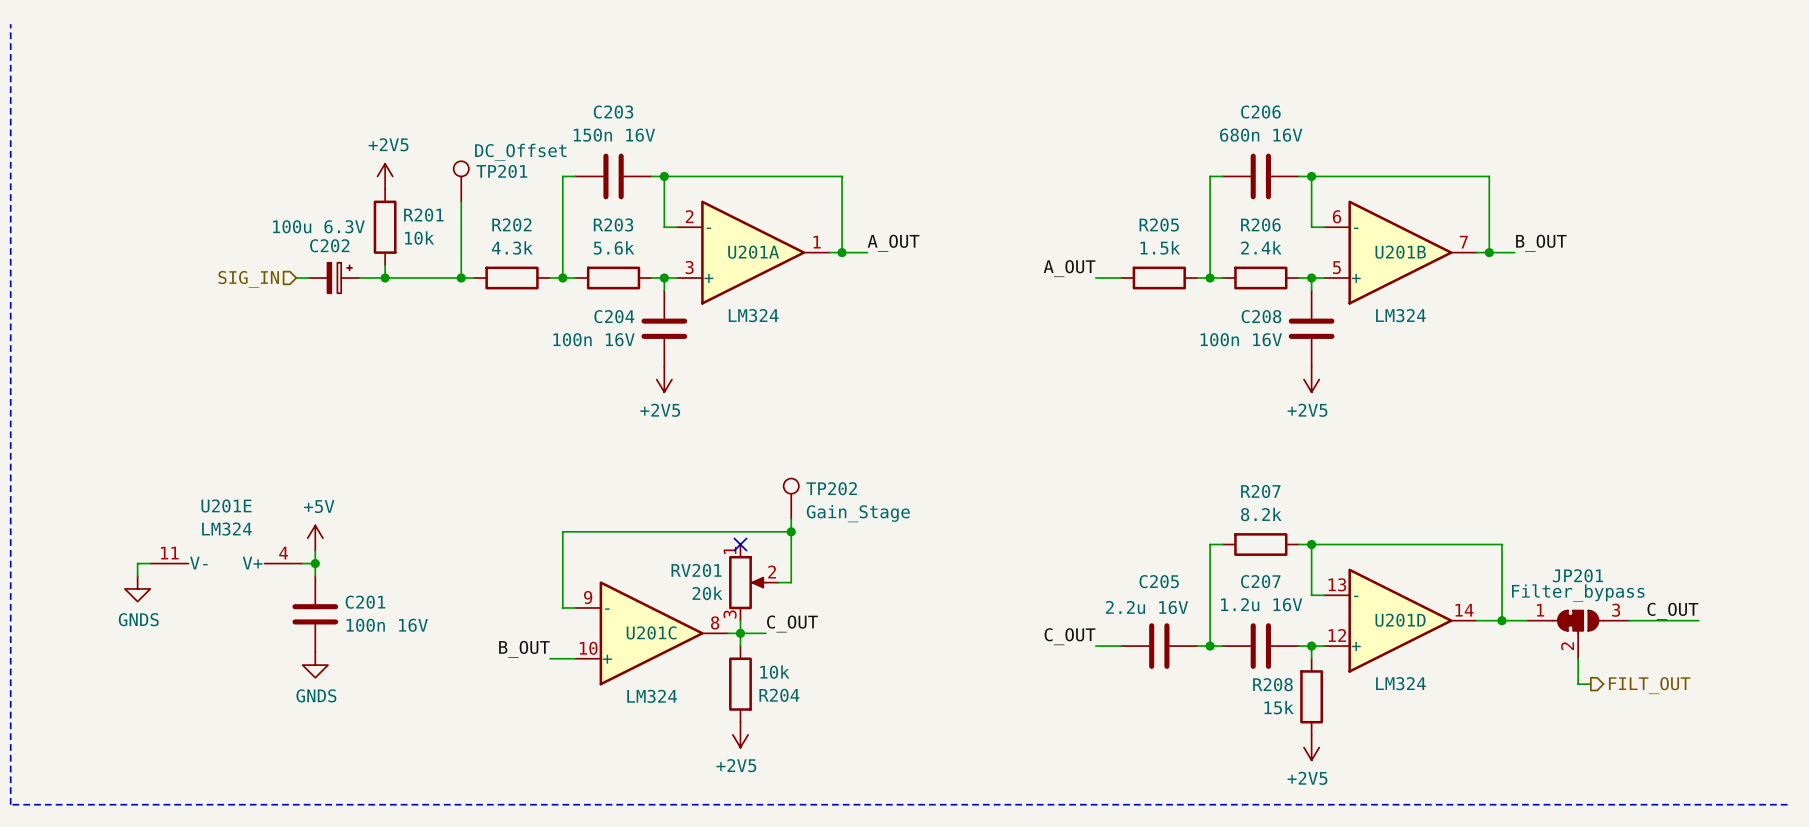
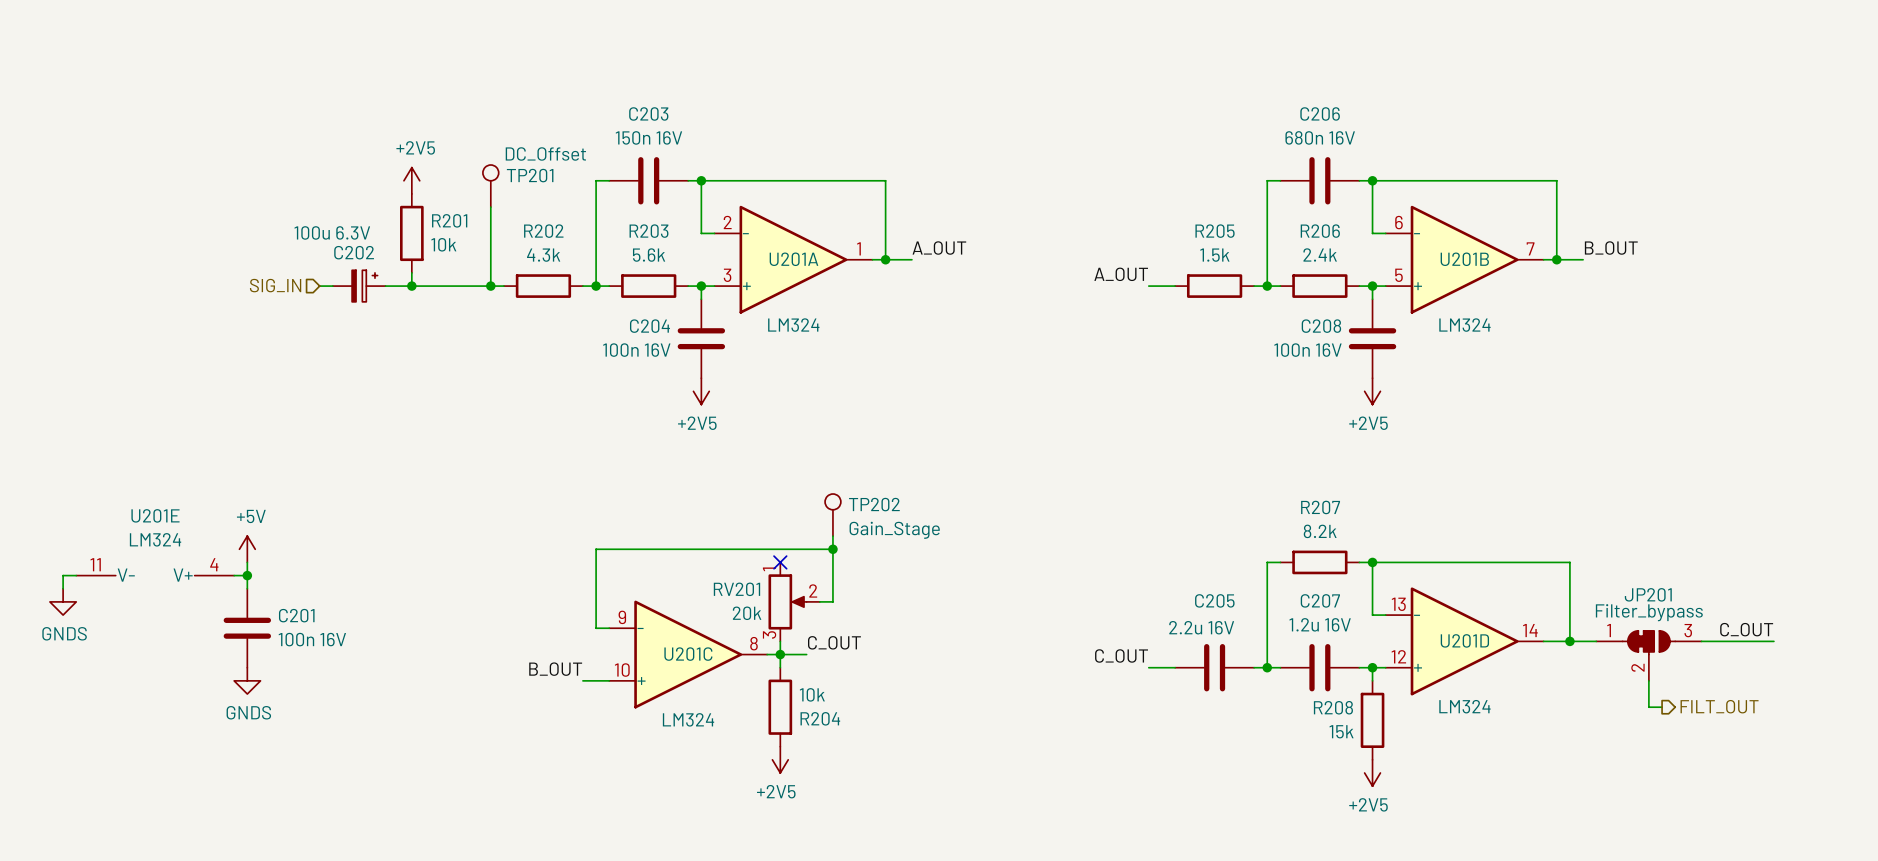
line: (10, 24) (10, 804) (1787, 804) -> none
power symbol position: +5V (315, 538) -> +5V (247, 549)
wire: (315, 550) (315, 576) -> (247, 562) (247, 588)
junction: none -> (247, 575)
wire: (150, 563) (137, 563) (137, 576) -> (76, 575) (63, 575) (63, 588)
U201E position: (226, 563) -> (155, 575)
wire: (302, 563) (315, 563) -> (234, 575) (247, 575)
junction: (315, 563) -> none
power symbol: none -> GNDS (63, 601)
power symbol: GNDS (137, 588) -> none
C201 position: (315, 614) -> (247, 628)
power symbol: none -> GNDS (247, 680)
power symbol: GNDS (315, 665) -> none

